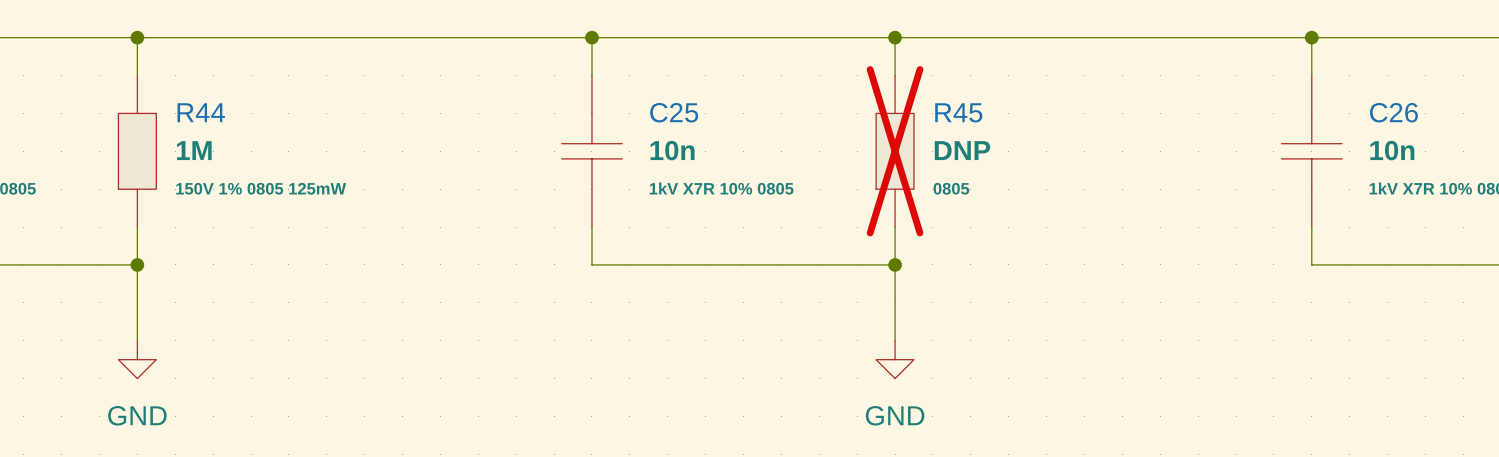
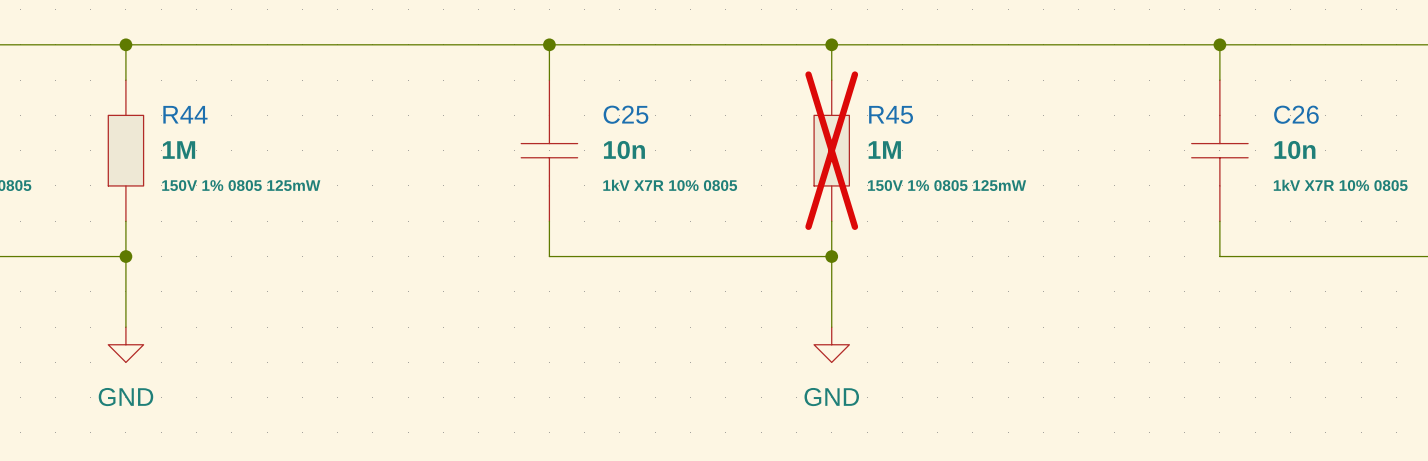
R45 value: DNP (962, 150) -> 1M (884, 150)
R45 text: 0805 (951, 188) -> 150V 1% 0805 125mW (947, 185)

